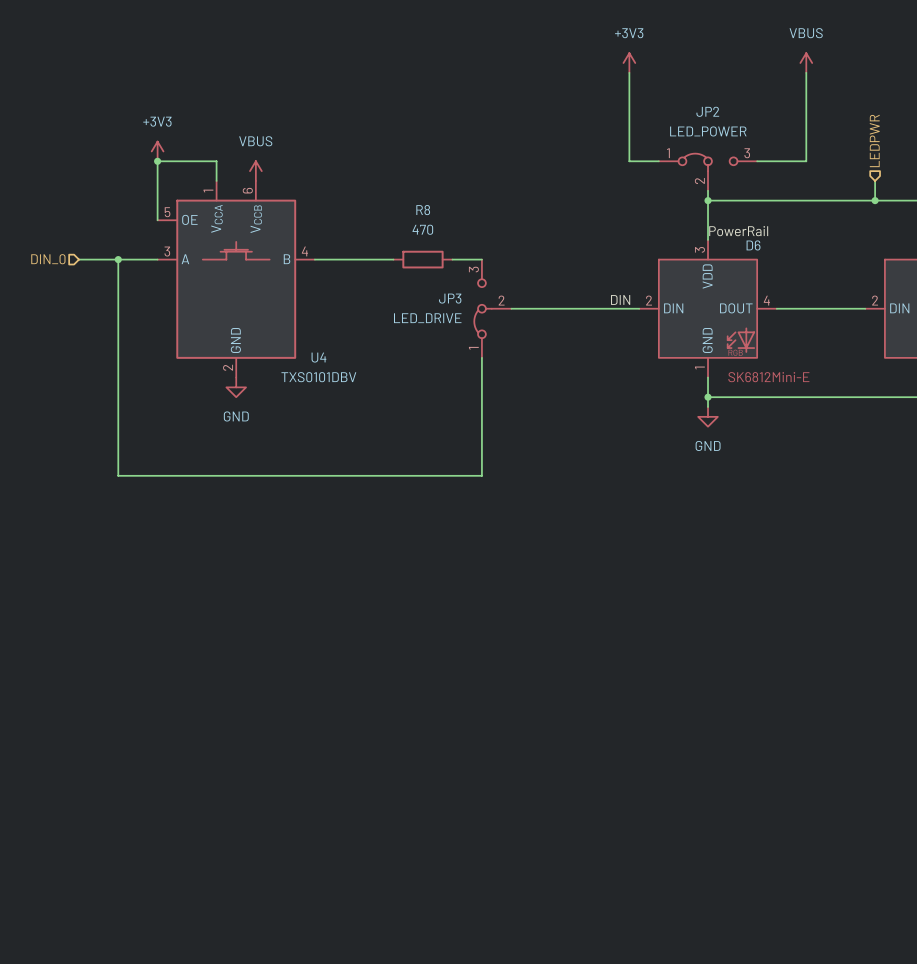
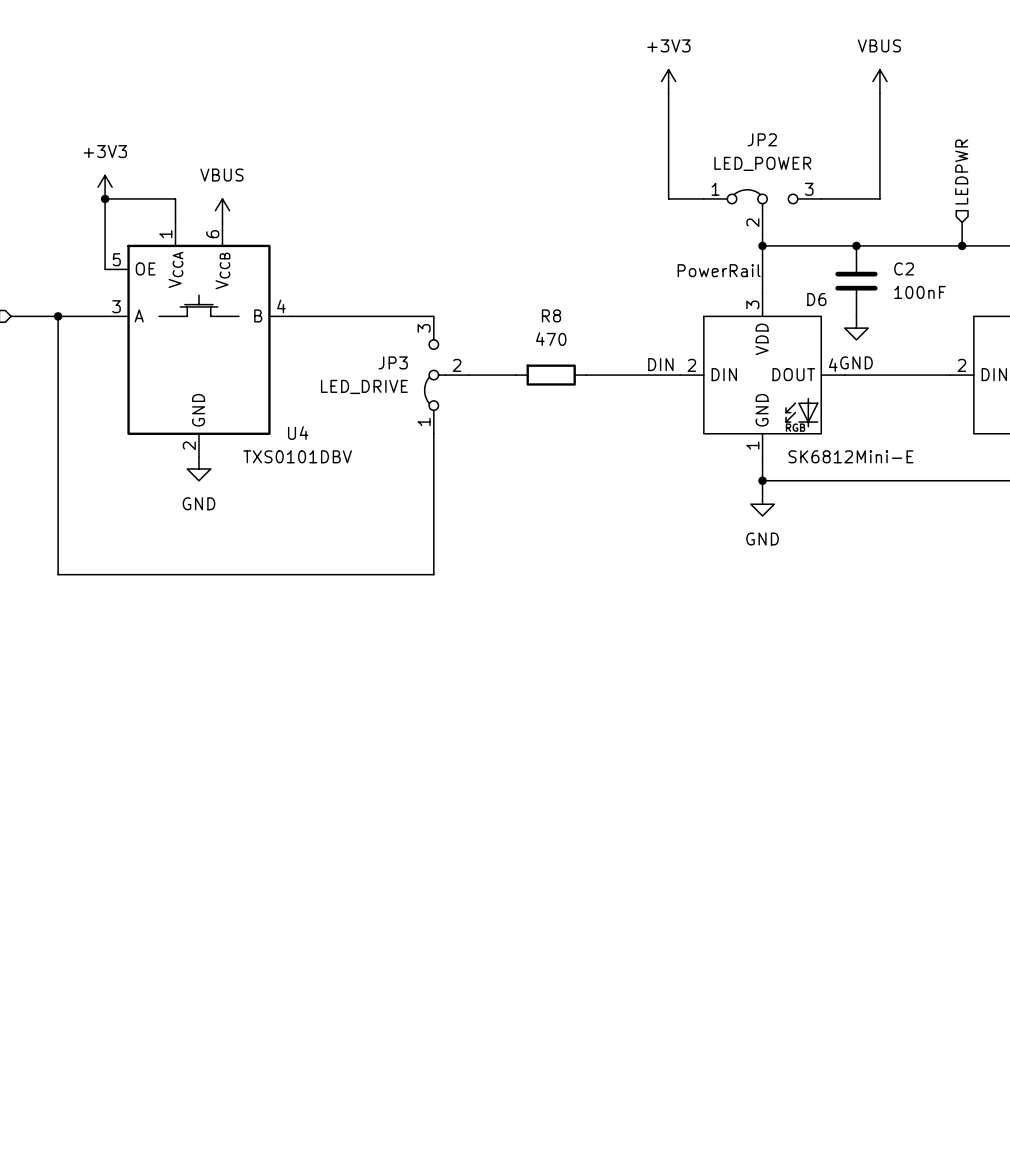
junction: none -> (856, 245)
C2: none -> 100nF (856, 281)
label position: PowerRail (738, 231) -> PowerRail (719, 270)
wire: none -> (386, 316) (433, 316)
R8 position: (422, 259) -> (551, 375)
wire: (452, 259) (481, 259) -> none
power symbol: none -> GND (856, 328)
wire: none -> (469, 375) (515, 375)
JP3 position: (492, 308) -> (446, 375)
wire: (511, 308) (560, 308) -> none
wire: (481, 357) (481, 475) (432, 475) -> (433, 433) (433, 574)

